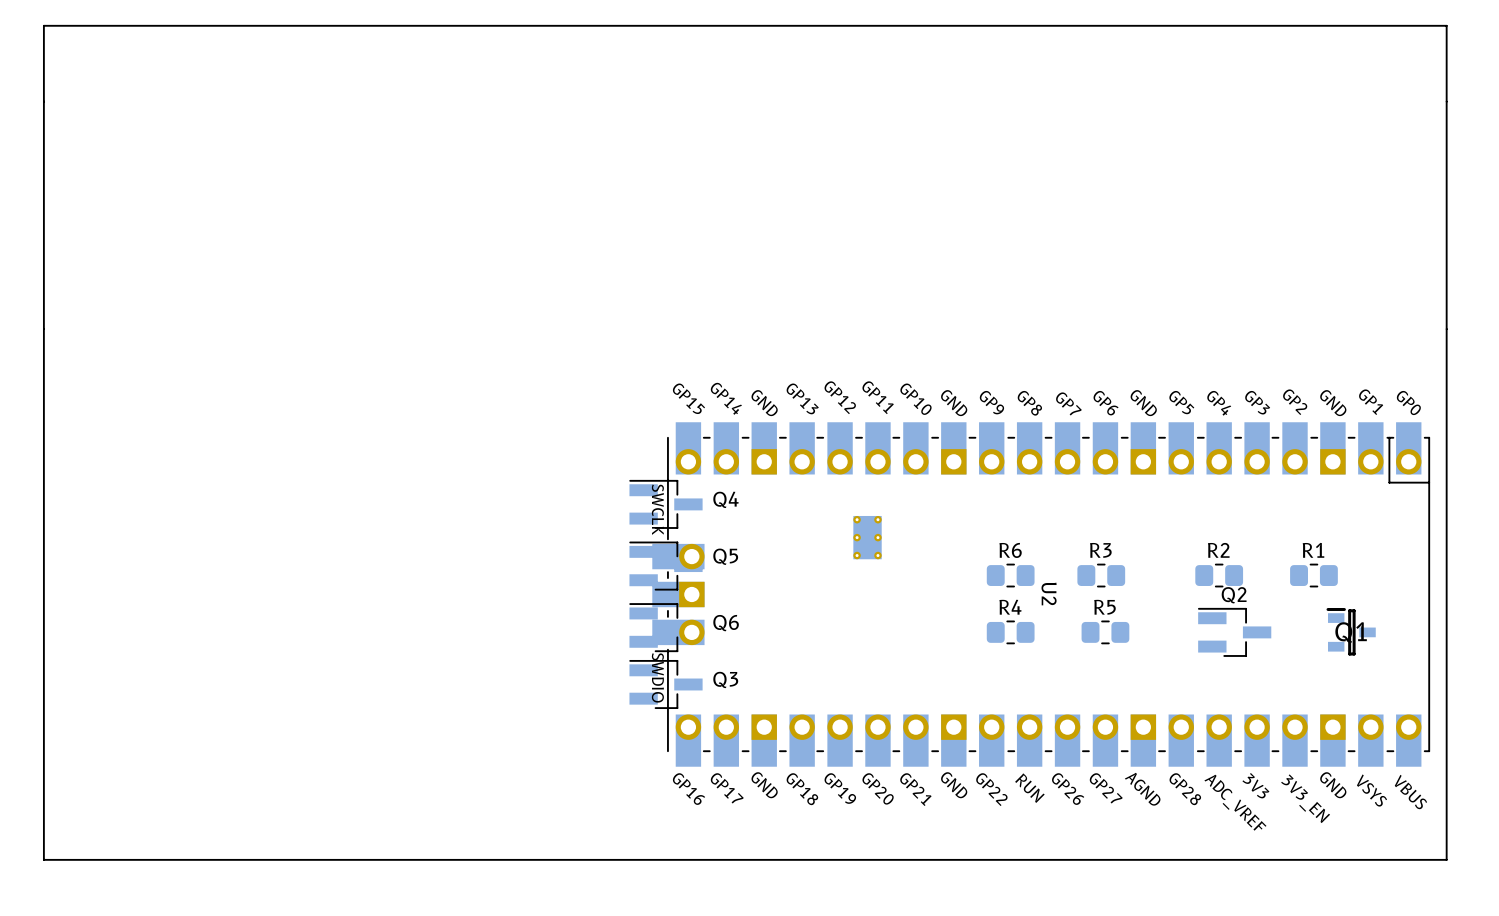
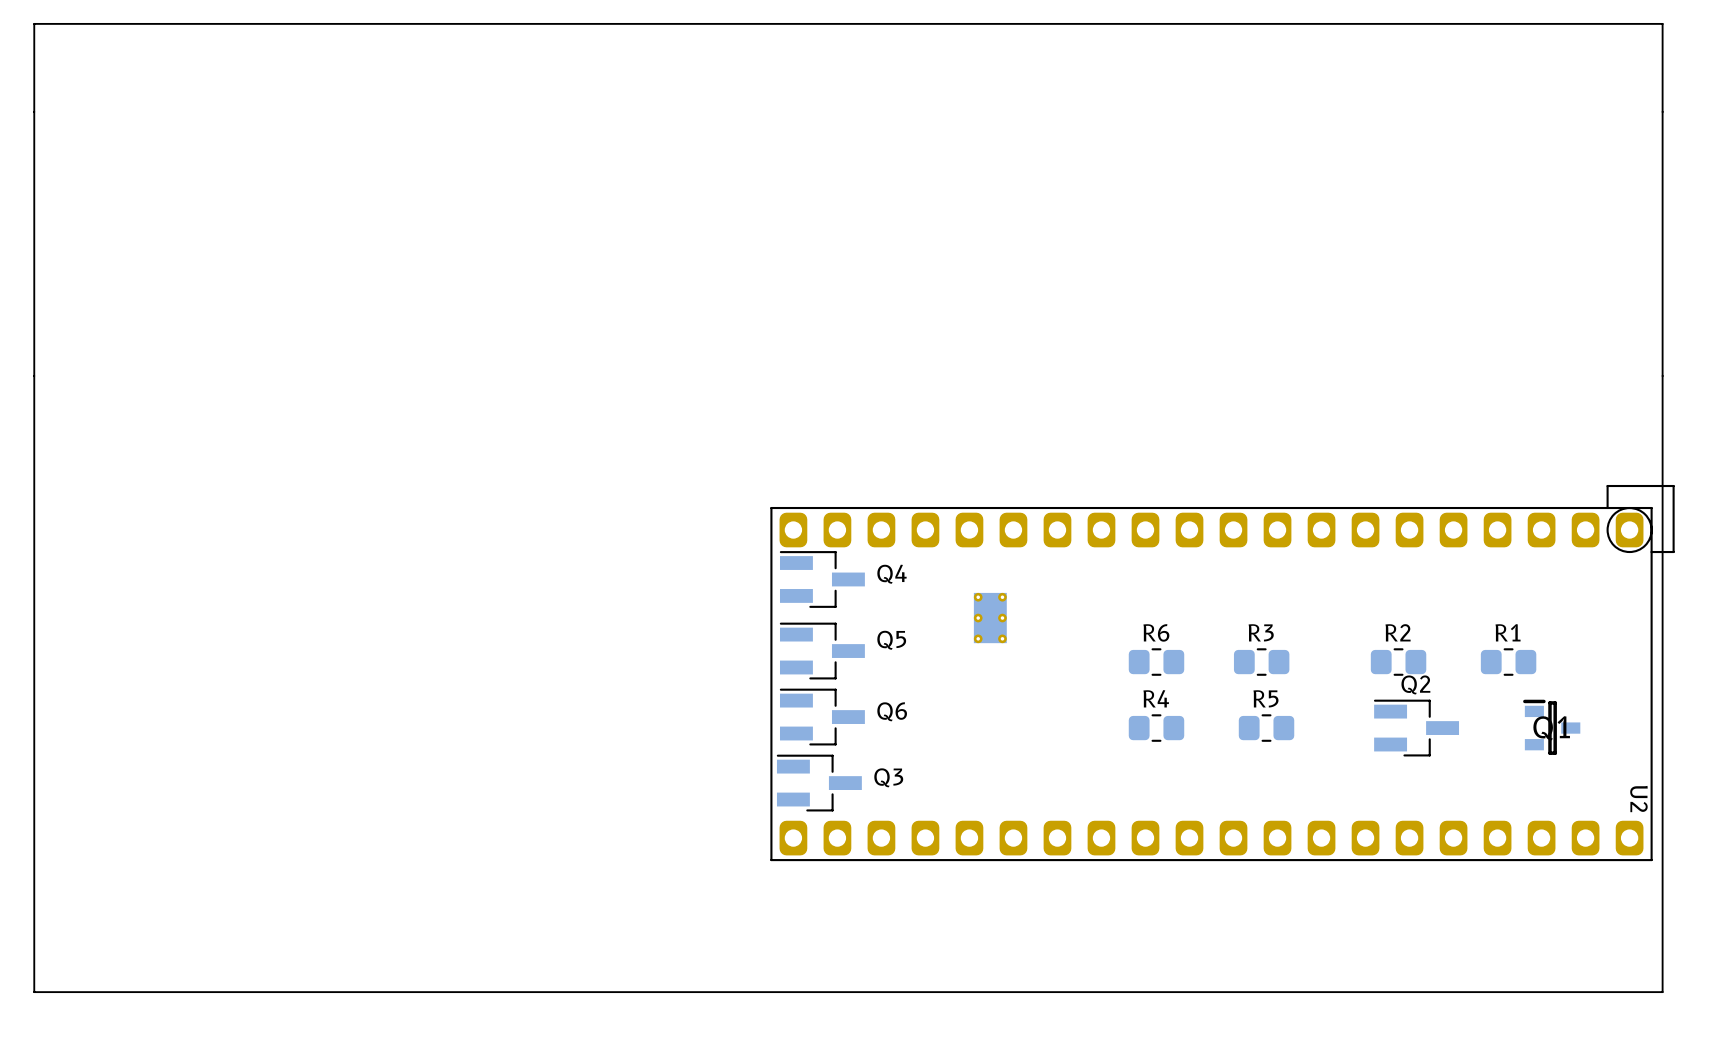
U2 footprint: [652, 422, 1431, 767] -> [770, 484, 1675, 862]
Q4 position: (665, 504) -> (822, 579)
Q5 position: (665, 566) -> (822, 651)
U2 name position: U2 (1049, 594) -> U2 (1638, 799)
Q6 position: (665, 627) -> (822, 717)
Q3 position: (665, 684) -> (819, 783)

